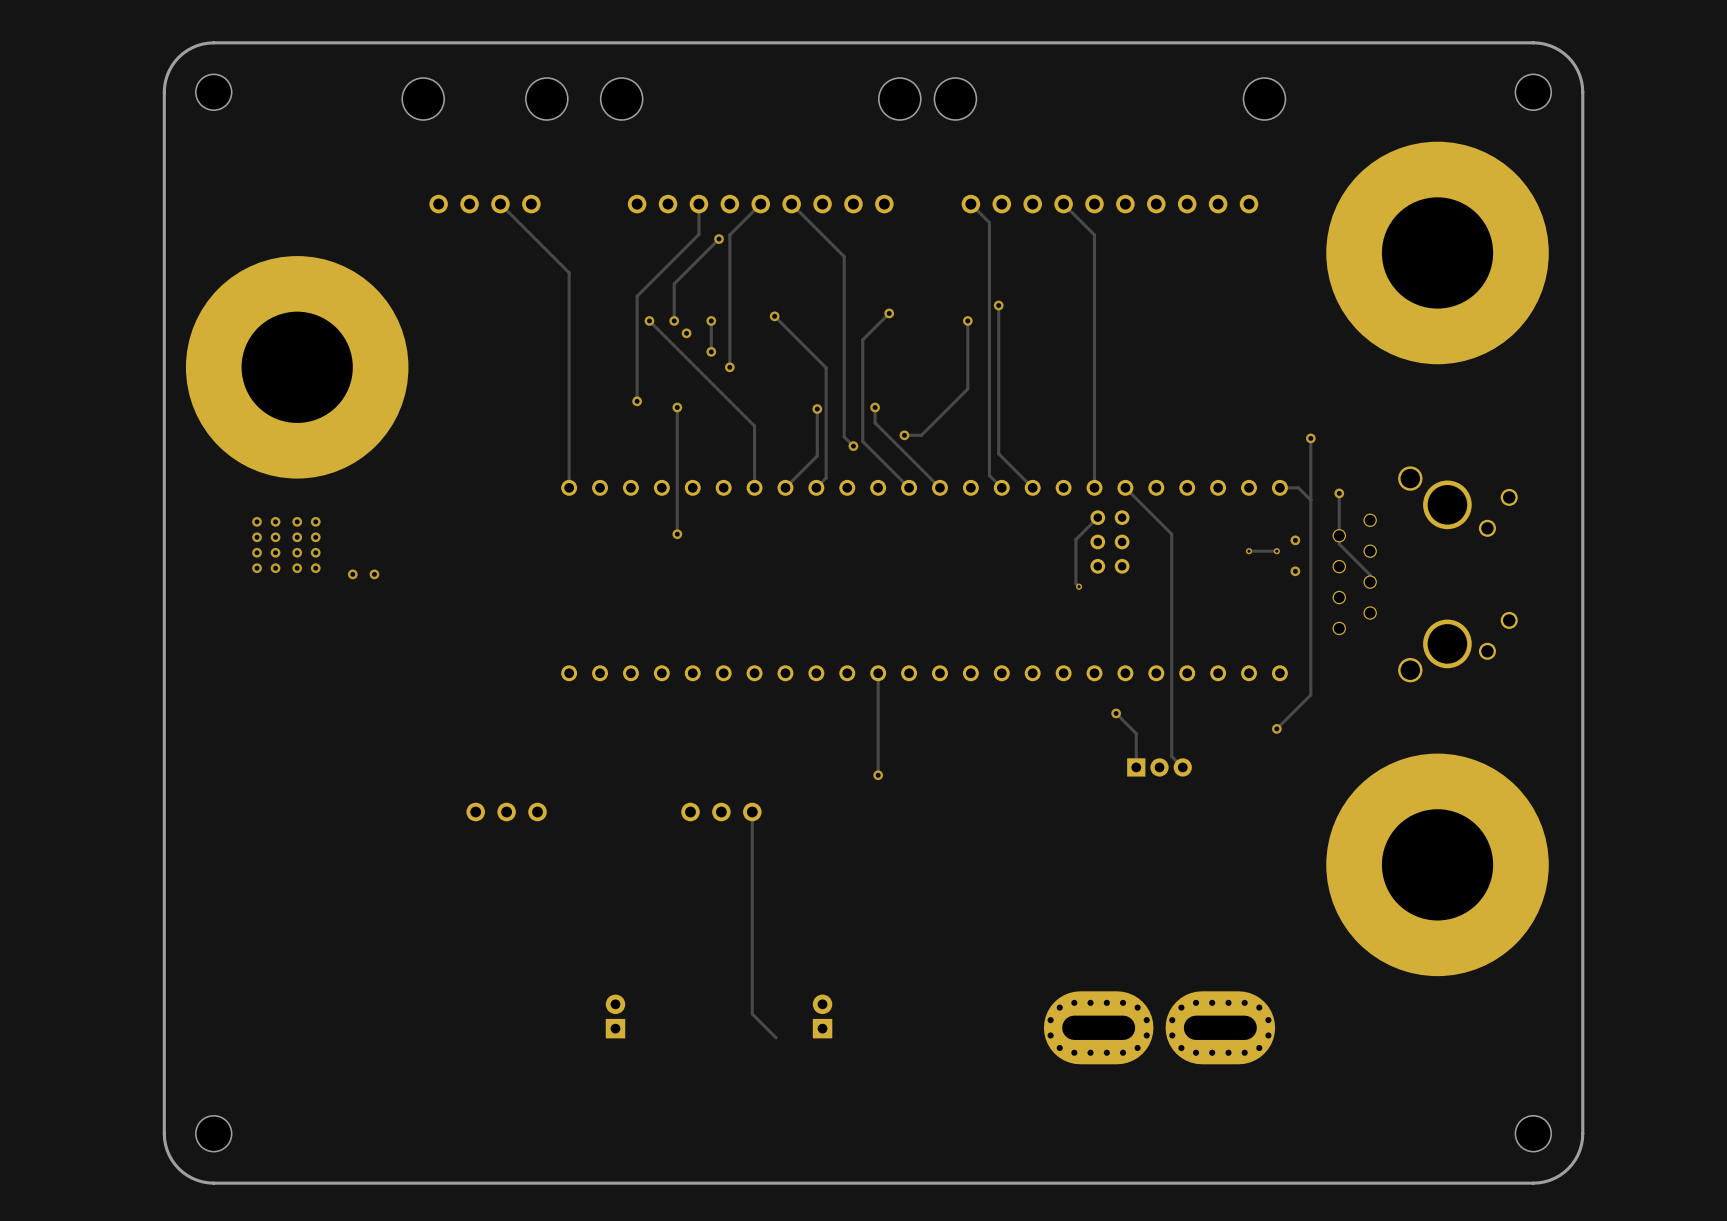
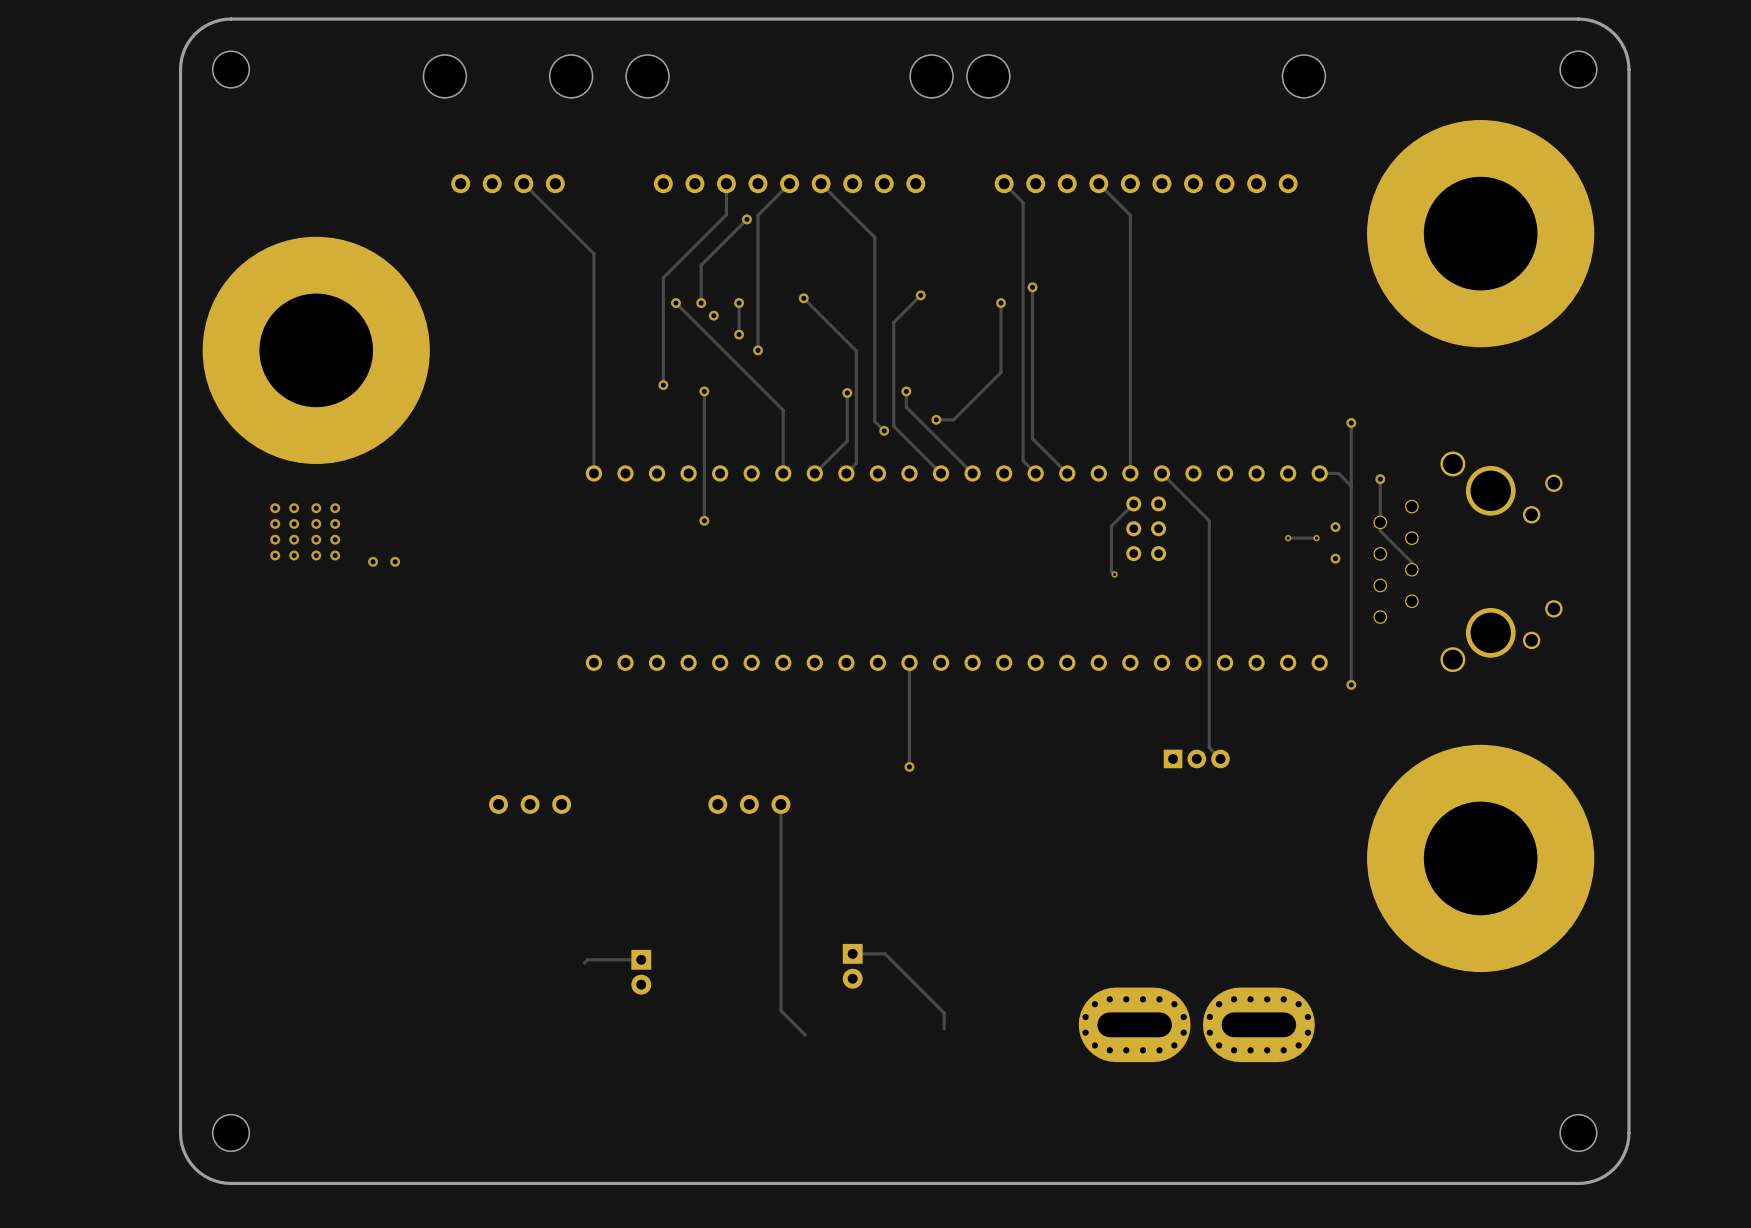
track: (1310, 694) (1276, 728) -> none
track: (1116, 713) (1136, 733) (1136, 767) -> none
via: (1116, 713) -> none
via position: (1276, 728) -> (1351, 684)
track: none -> (852, 953) (885, 953) (944, 1013) (944, 1028)
track: none -> (641, 959) (587, 959) (584, 962)
part rotation: 0° (615, 1016) -> 180° (641, 972)
part position: (615, 1016) -> (641, 972)
part rotation: 0° (822, 1016) -> 180° (852, 966)
part position: (822, 1016) -> (852, 966)

